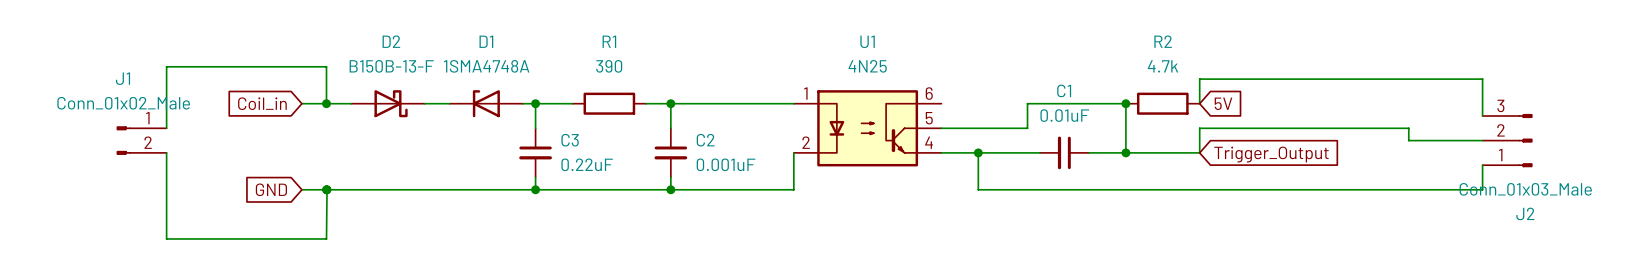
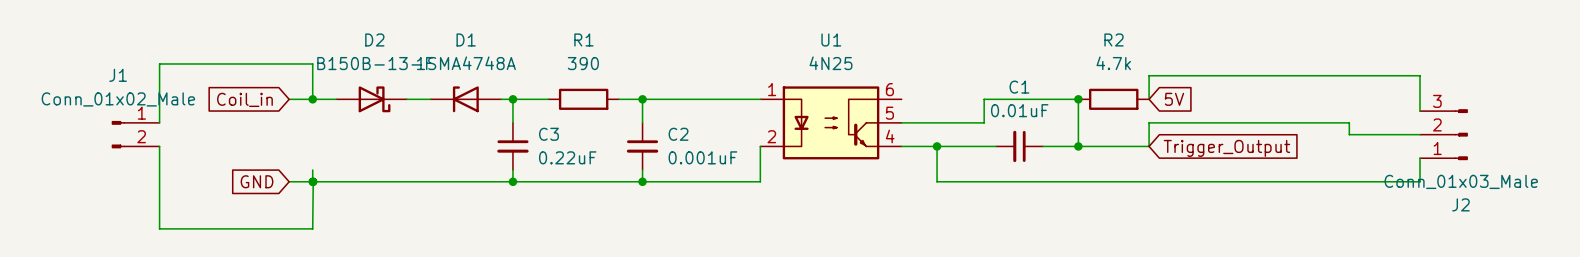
wire: none -> (312, 170) (313, 181)

